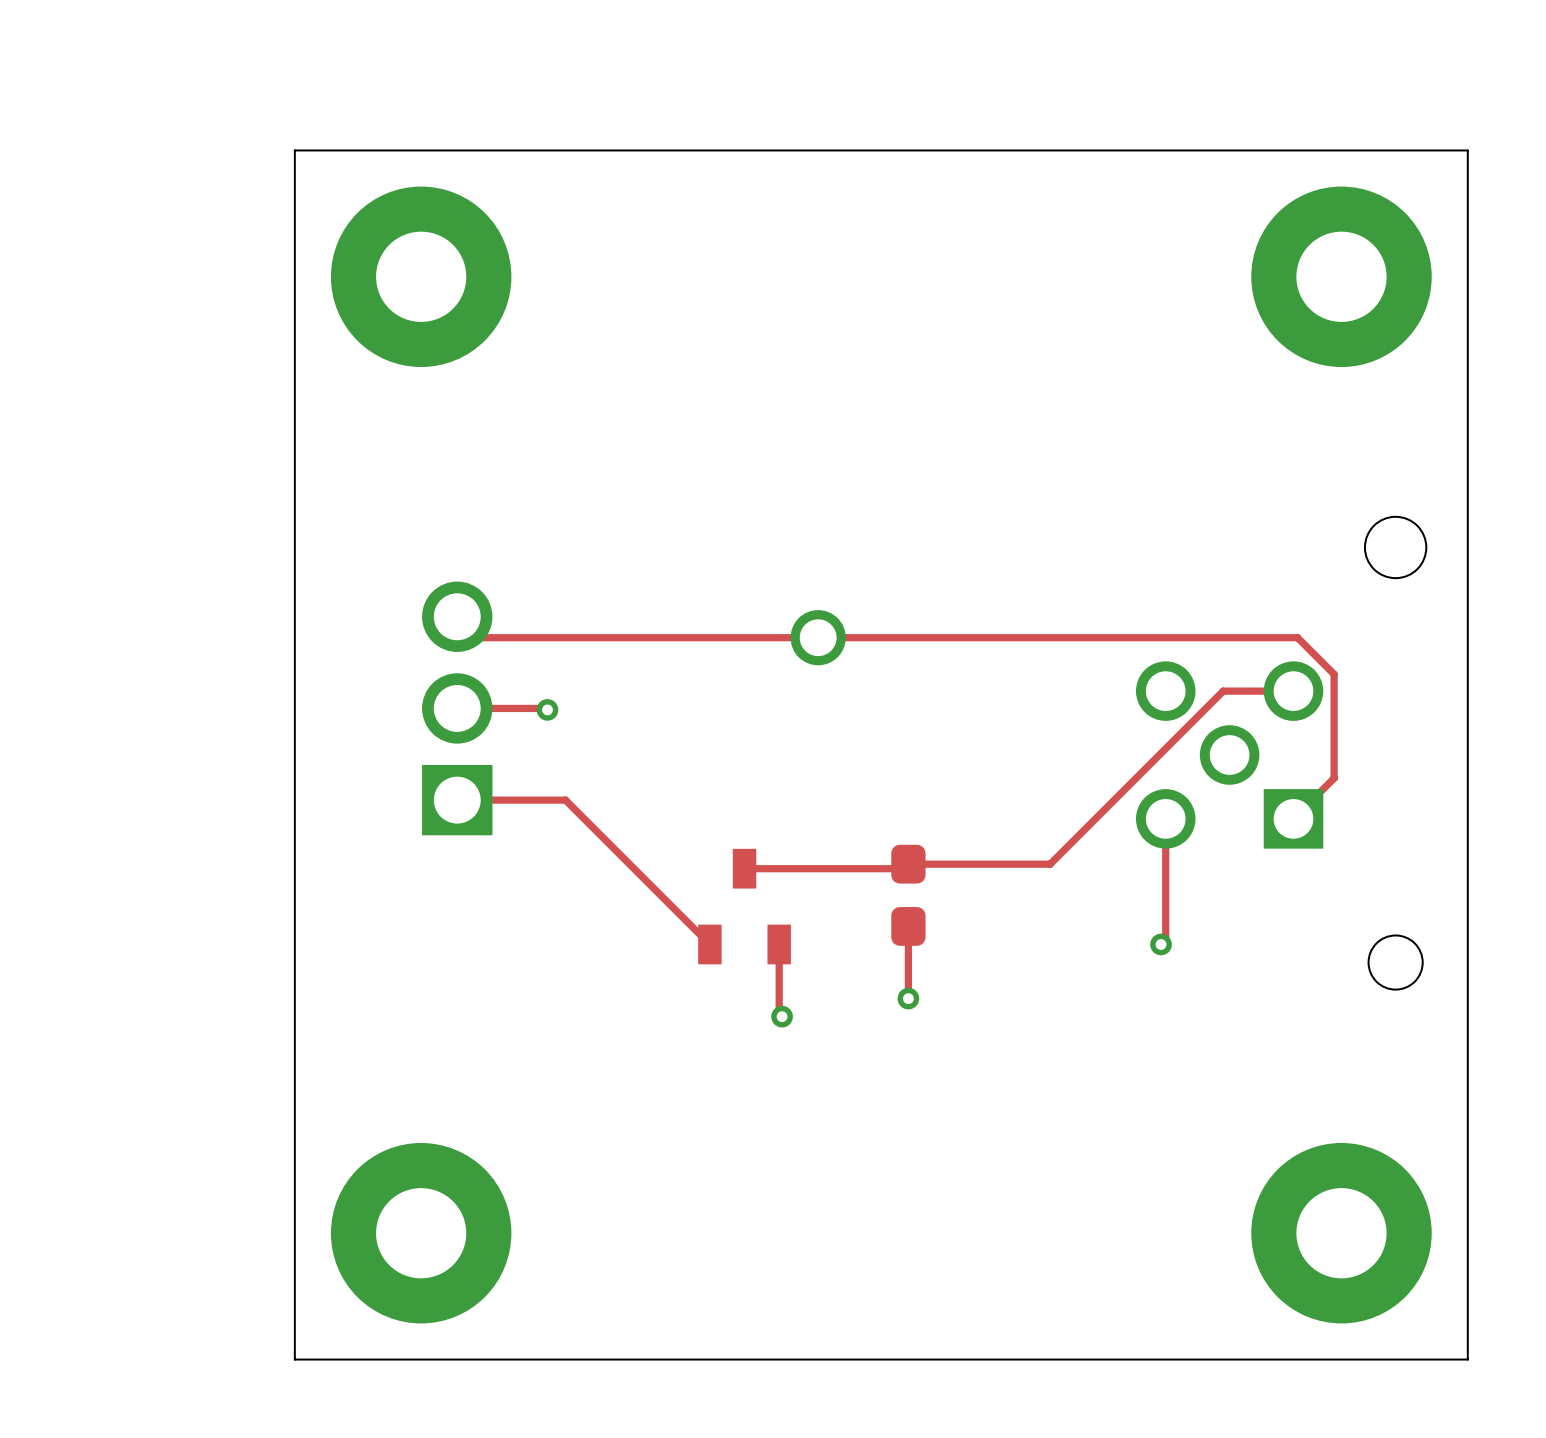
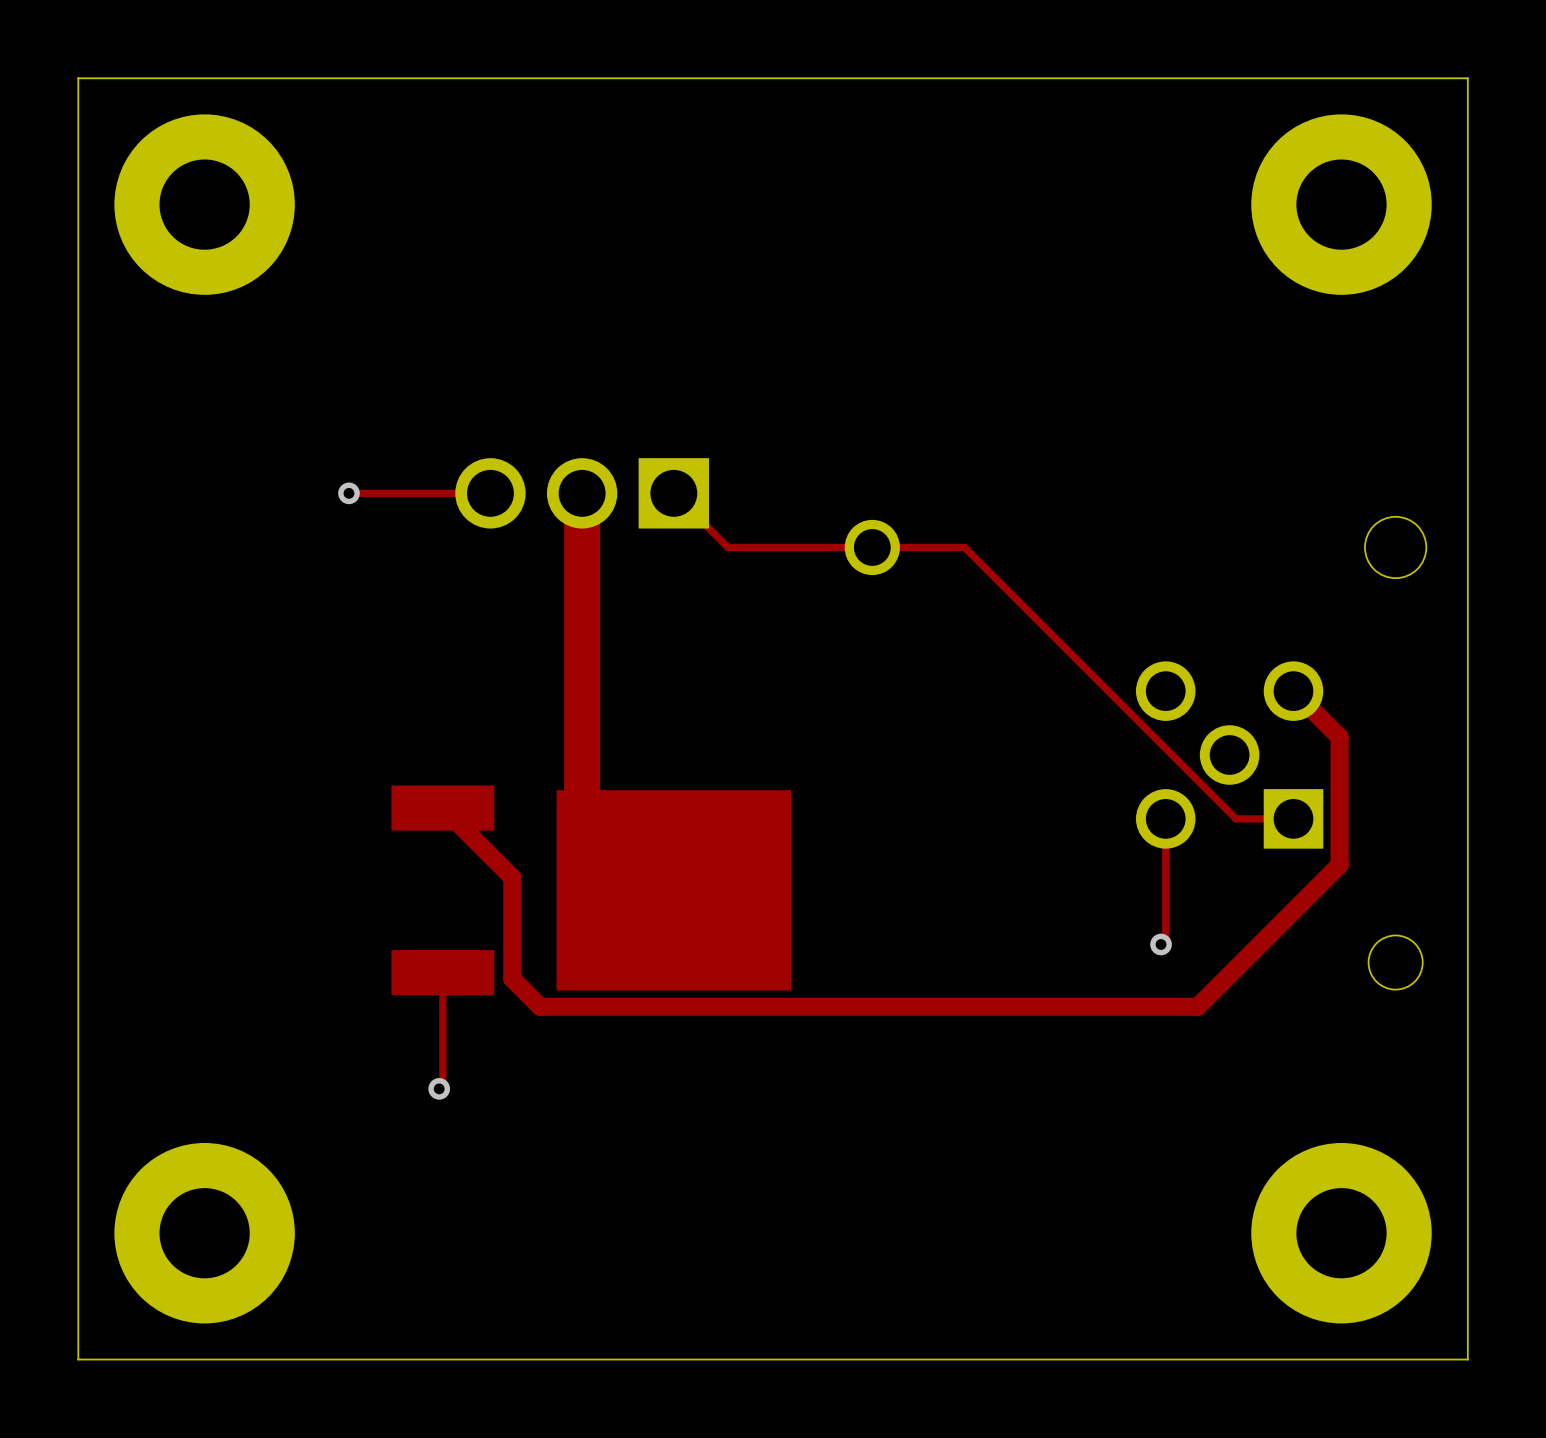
board edge: (1467, 150) (294, 150) (294, 1359) -> (1467, 150) (1467, 78) (78, 78) (78, 1359) (294, 1359)
part position: (421, 276) -> (204, 204)
part position: (1341, 276) -> (1341, 204)
via: none -> (348, 493)
top track: none -> (490, 493) (348, 493)
top track: none -> (582, 493) (582, 798) (673, 890)
top track: (457, 616) (478, 637) (1297, 637) (1334, 674) (1334, 778) (1293, 818) -> (673, 493) (727, 547) (964, 547) (1236, 818) (1293, 818)
part position: (818, 637) -> (872, 547)
top track: (1293, 691) (1223, 691) (1050, 864) (908, 864) (903, 868) (744, 868) -> (1293, 691) (1339, 737) (1339, 864) (1197, 1006) (540, 1006) (512, 978) (512, 877) (442, 808)
top track: (457, 708) (547, 709) -> none
part rotation: 0° (457, 708) -> 90° counterclockwise (582, 493)
part position: (457, 708) -> (582, 493)
via: (547, 709) -> none
top track: (457, 800) (565, 800) (709, 944) -> none
part: none -> (591, 890)
part: (908, 895) -> none
part: (744, 906) -> none
top track: (908, 926) (908, 998) -> none
top track: (779, 944) (779, 1013) (782, 1016) -> none
top track: none -> (442, 972) (442, 1085) (439, 1088)
via: (908, 998) -> none
via: (782, 1016) -> none
via: none -> (439, 1088)
part position: (421, 1233) -> (204, 1233)

